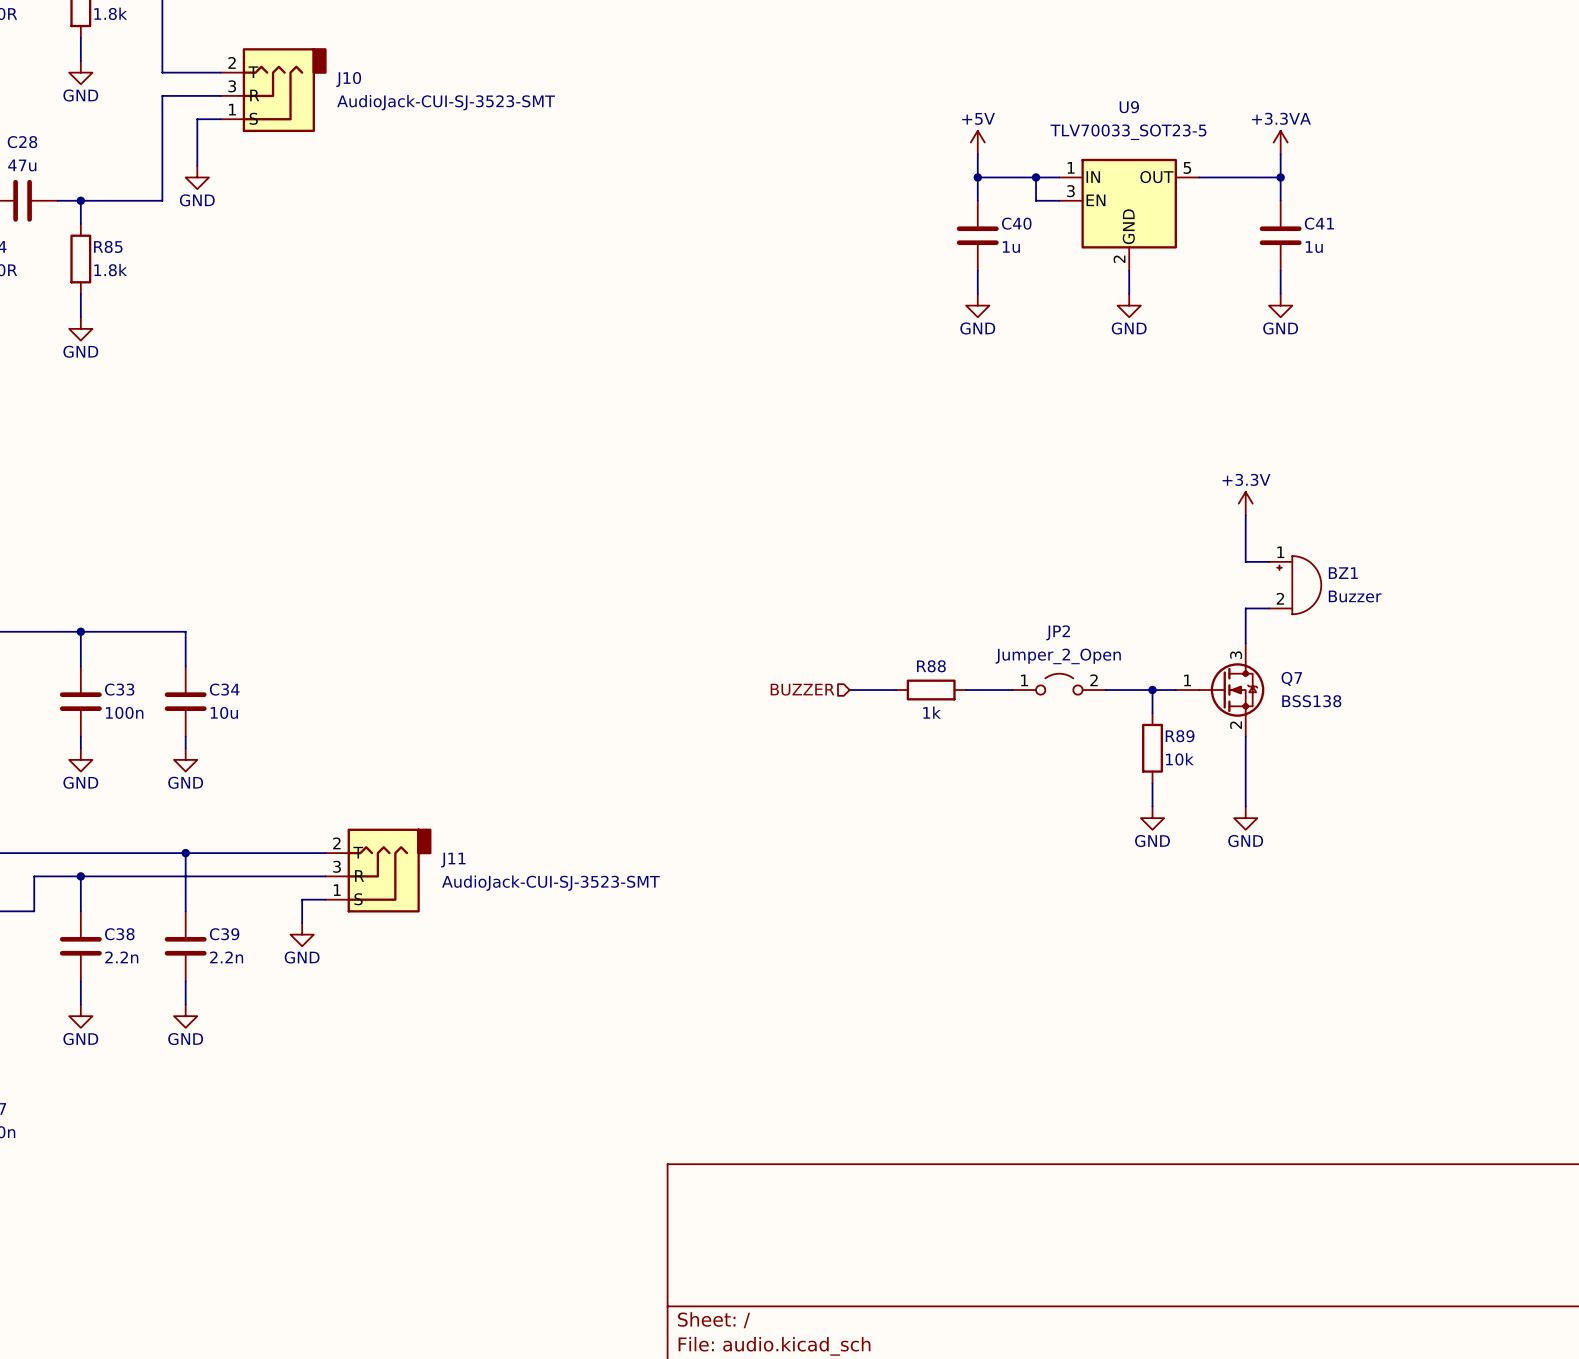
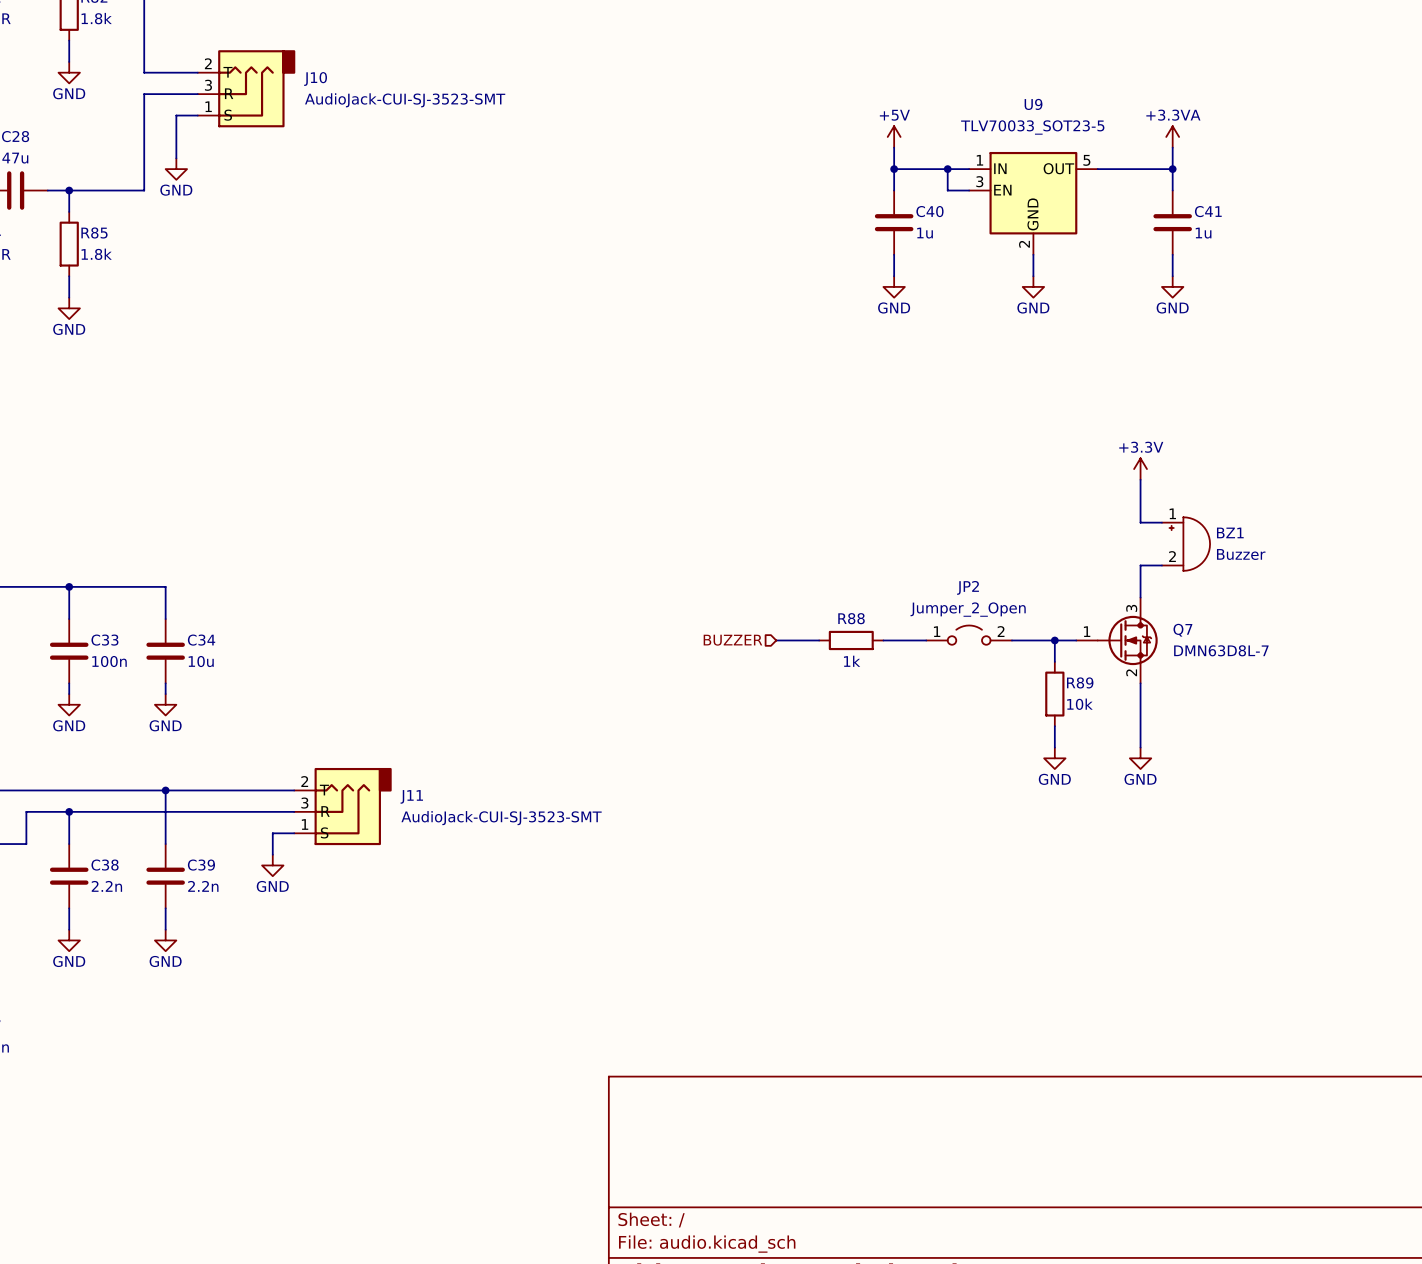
Q7 value: BSS138 (1311, 701) -> DMN63D8L-7 (1221, 650)

